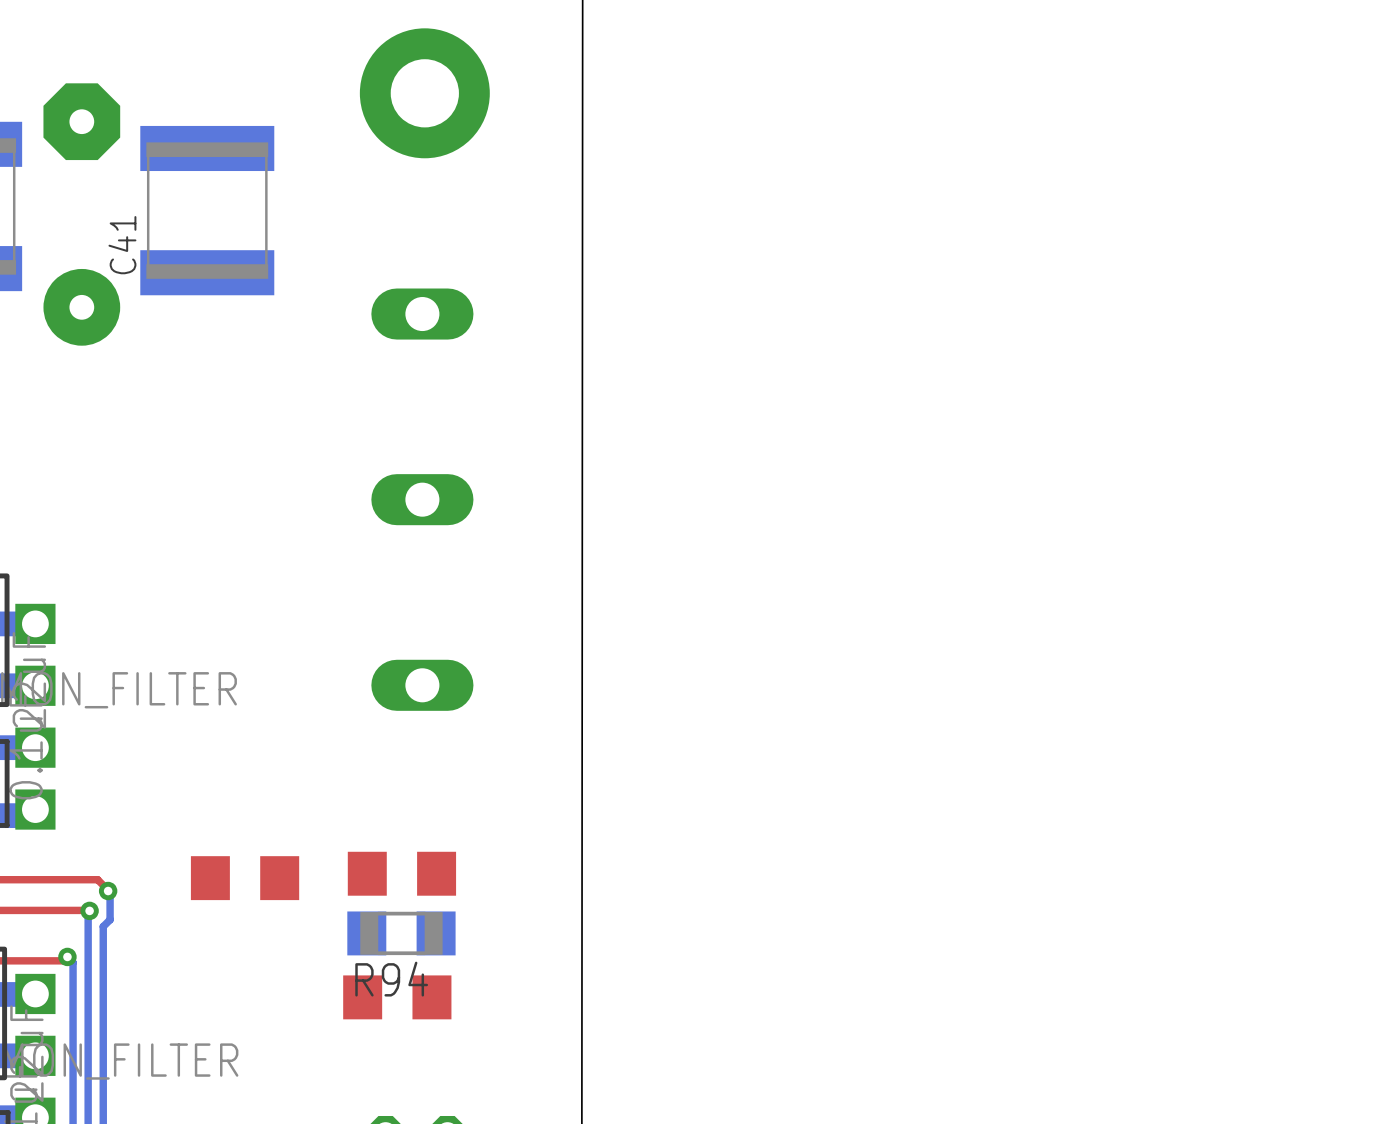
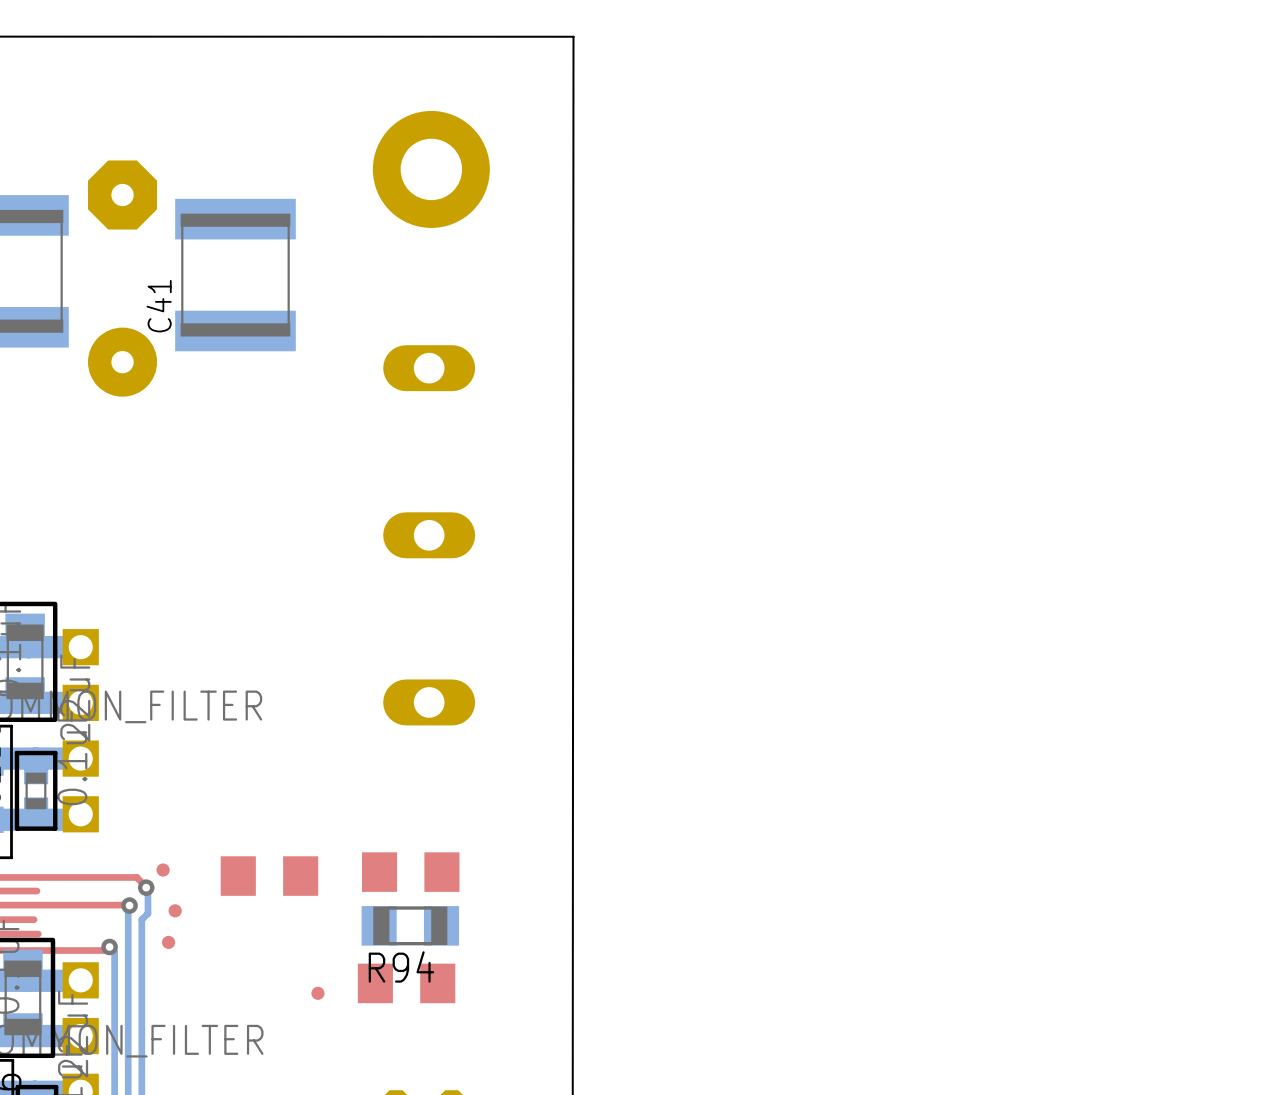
part: none -> (163, 870)
part: none -> (175, 910)
part: none -> (168, 942)
part: none -> (317, 993)

